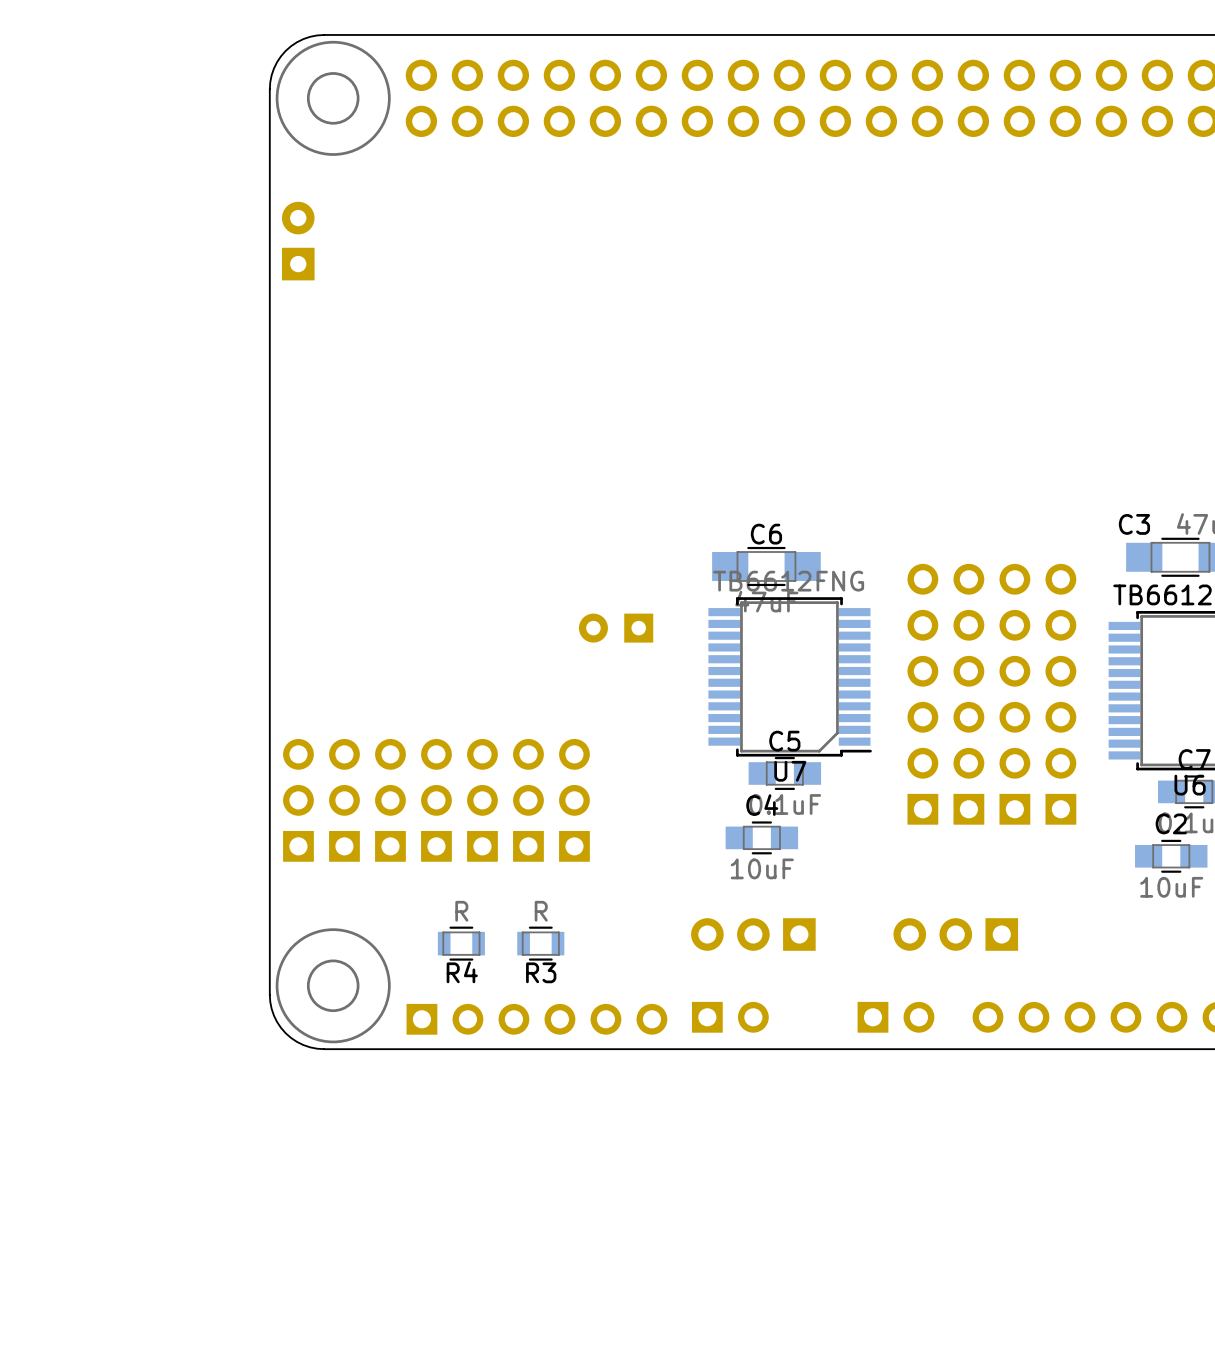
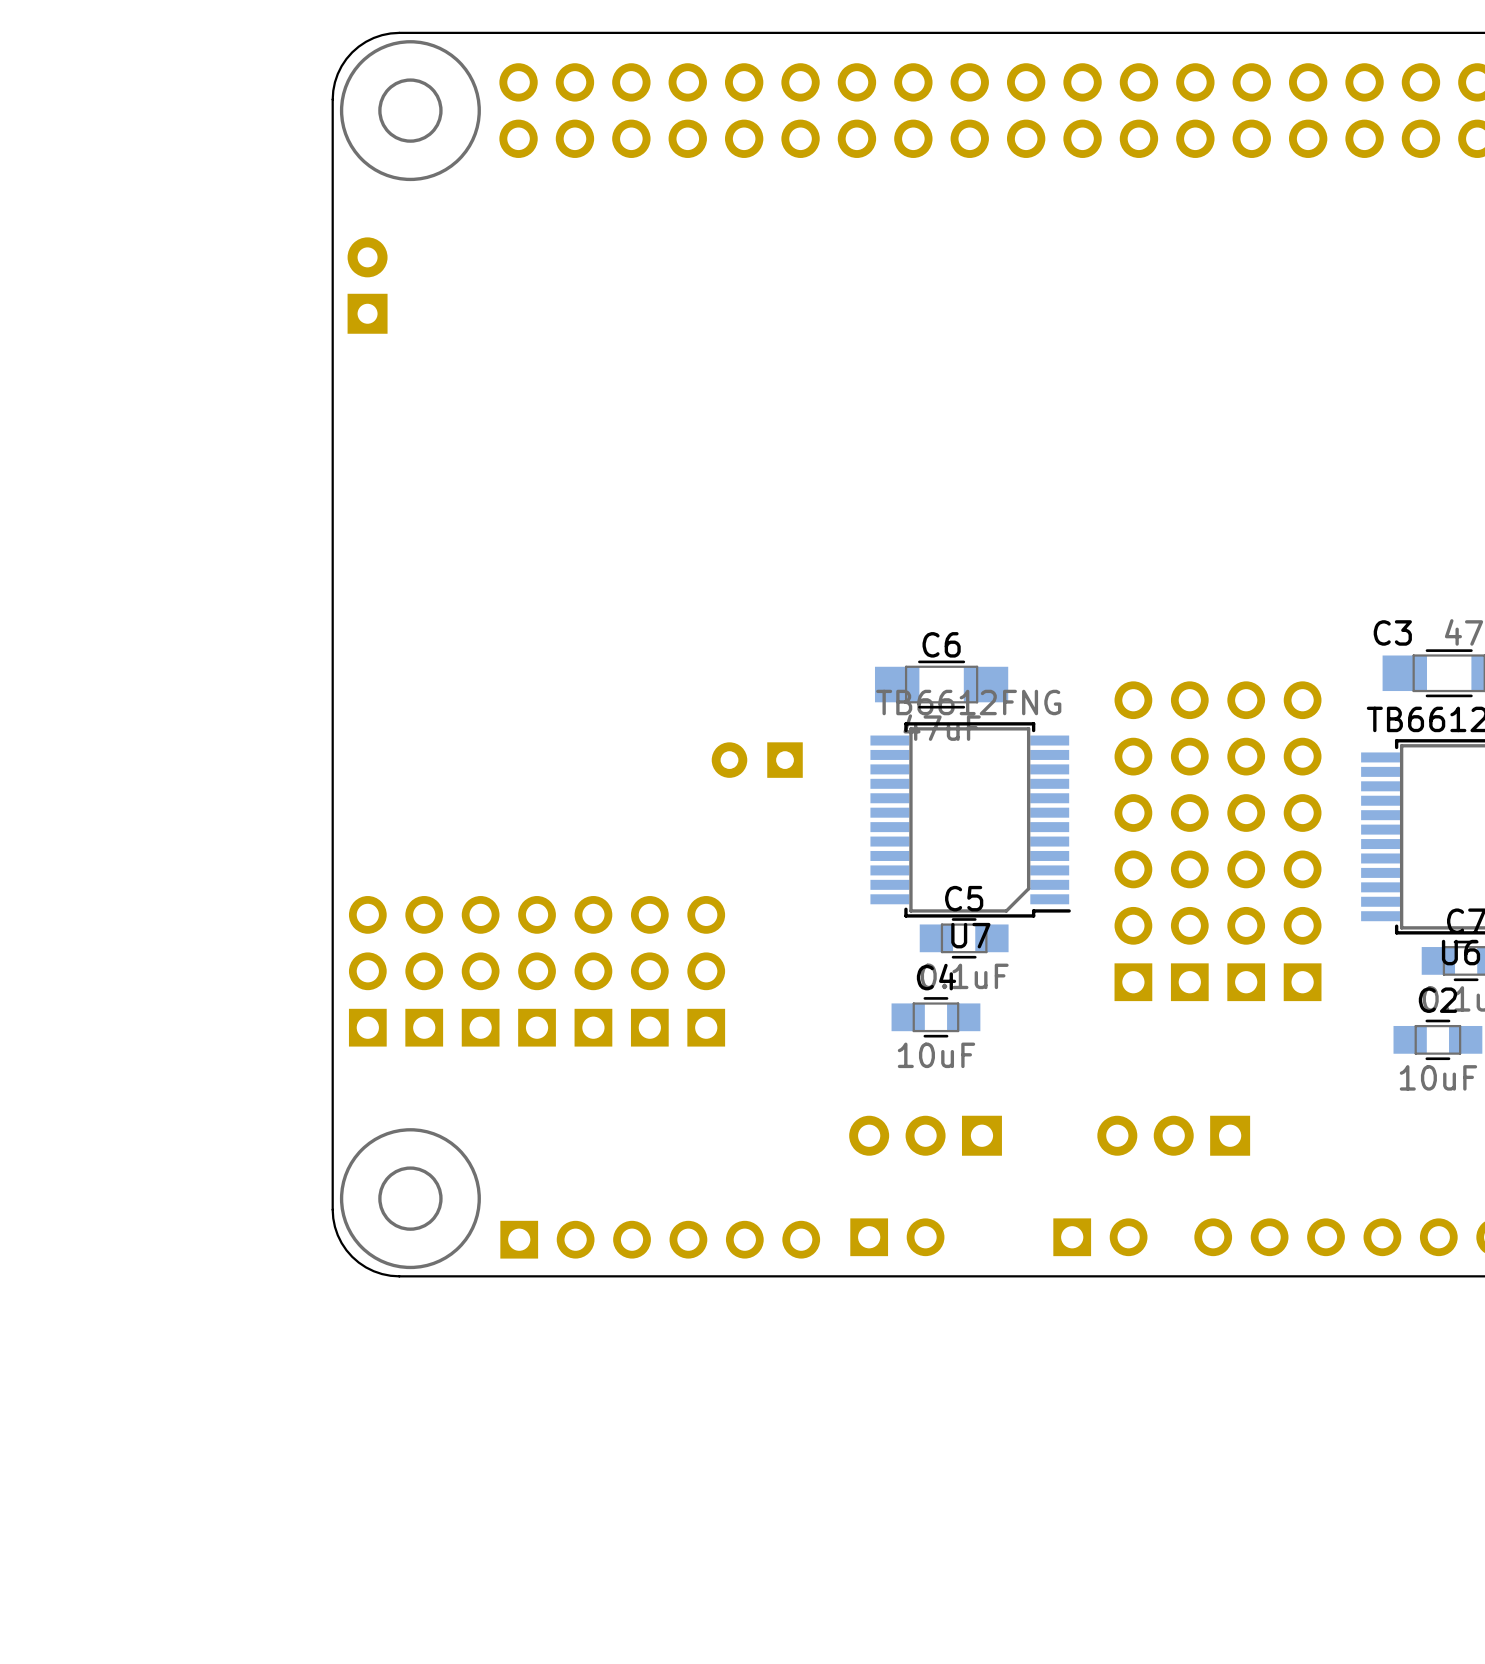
R4: R (461, 943) -> none
R3: R (540, 943) -> none

